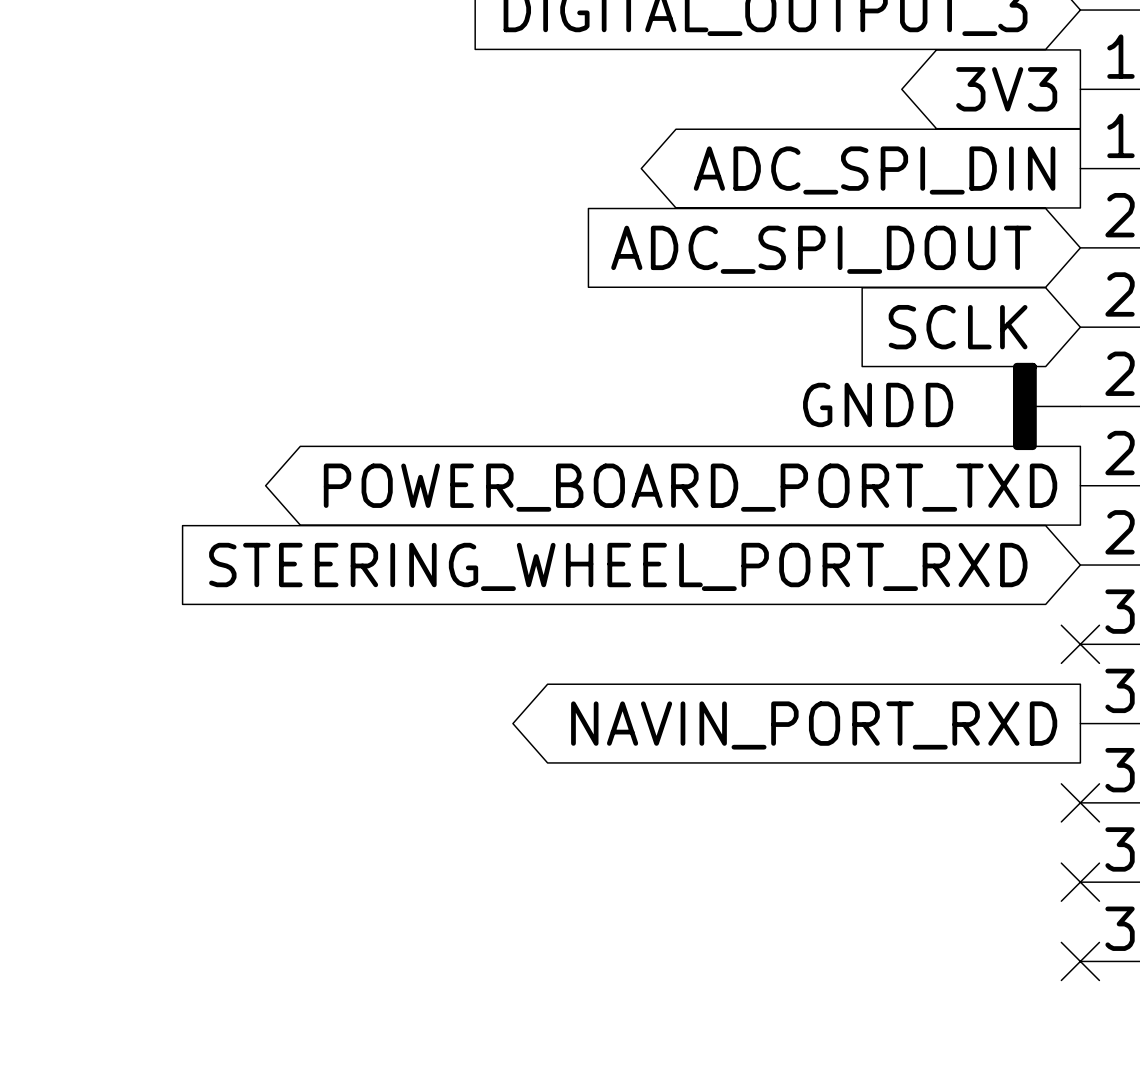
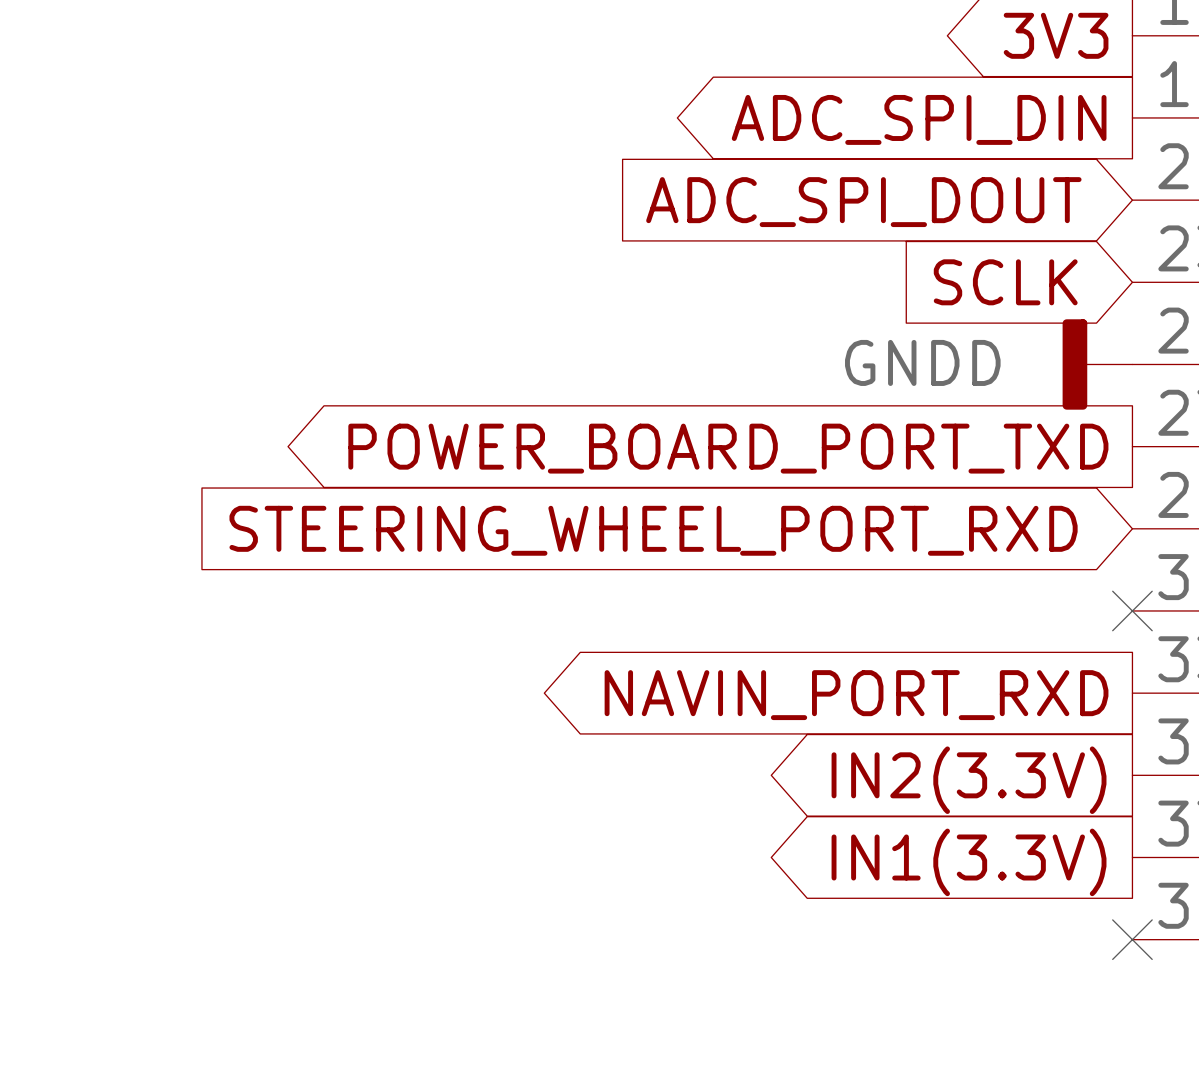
no-connect mark: (1080, 802) -> none
global label: none -> IN2(3.3V) (969, 780)
no-connect mark: (1080, 882) -> none
global label: none -> IN1(3.3V) (969, 862)

